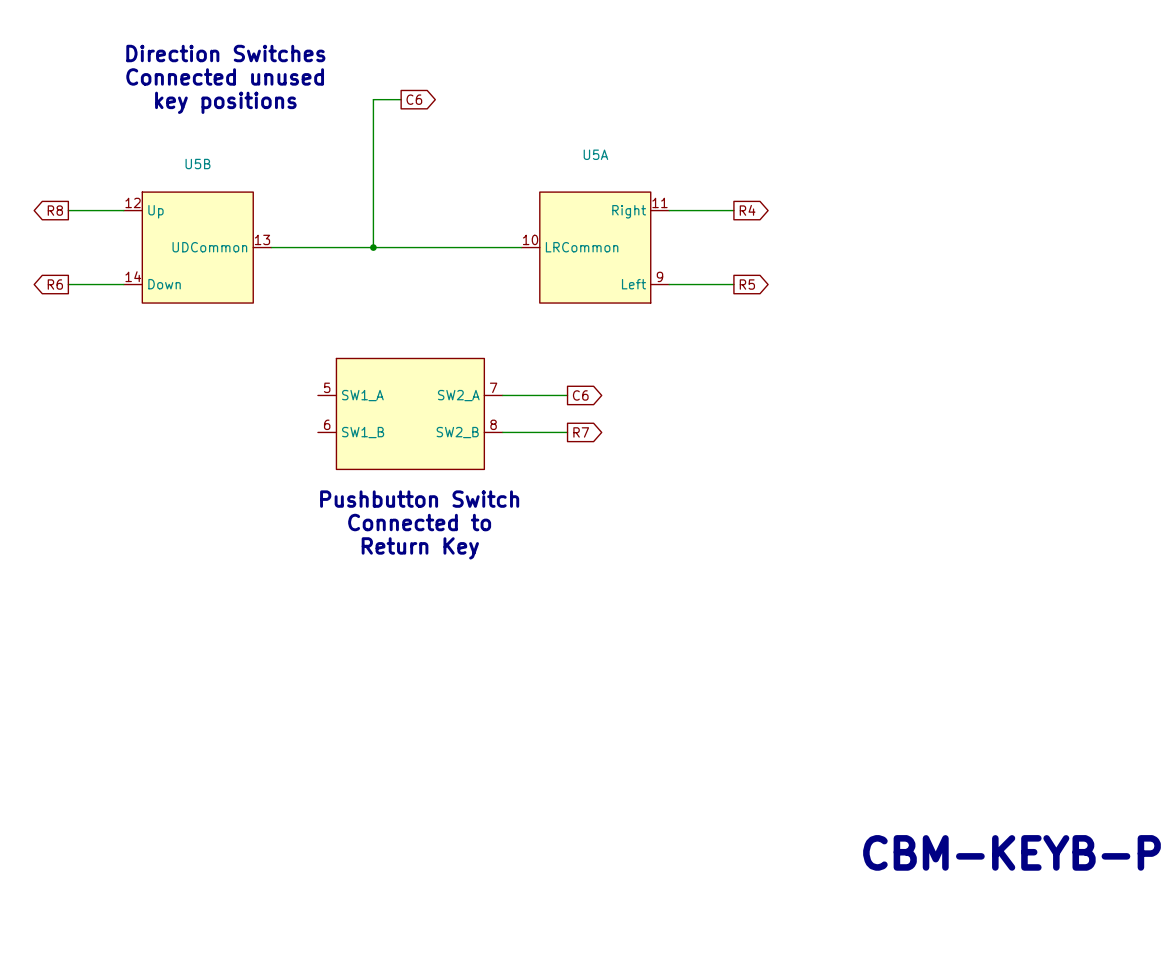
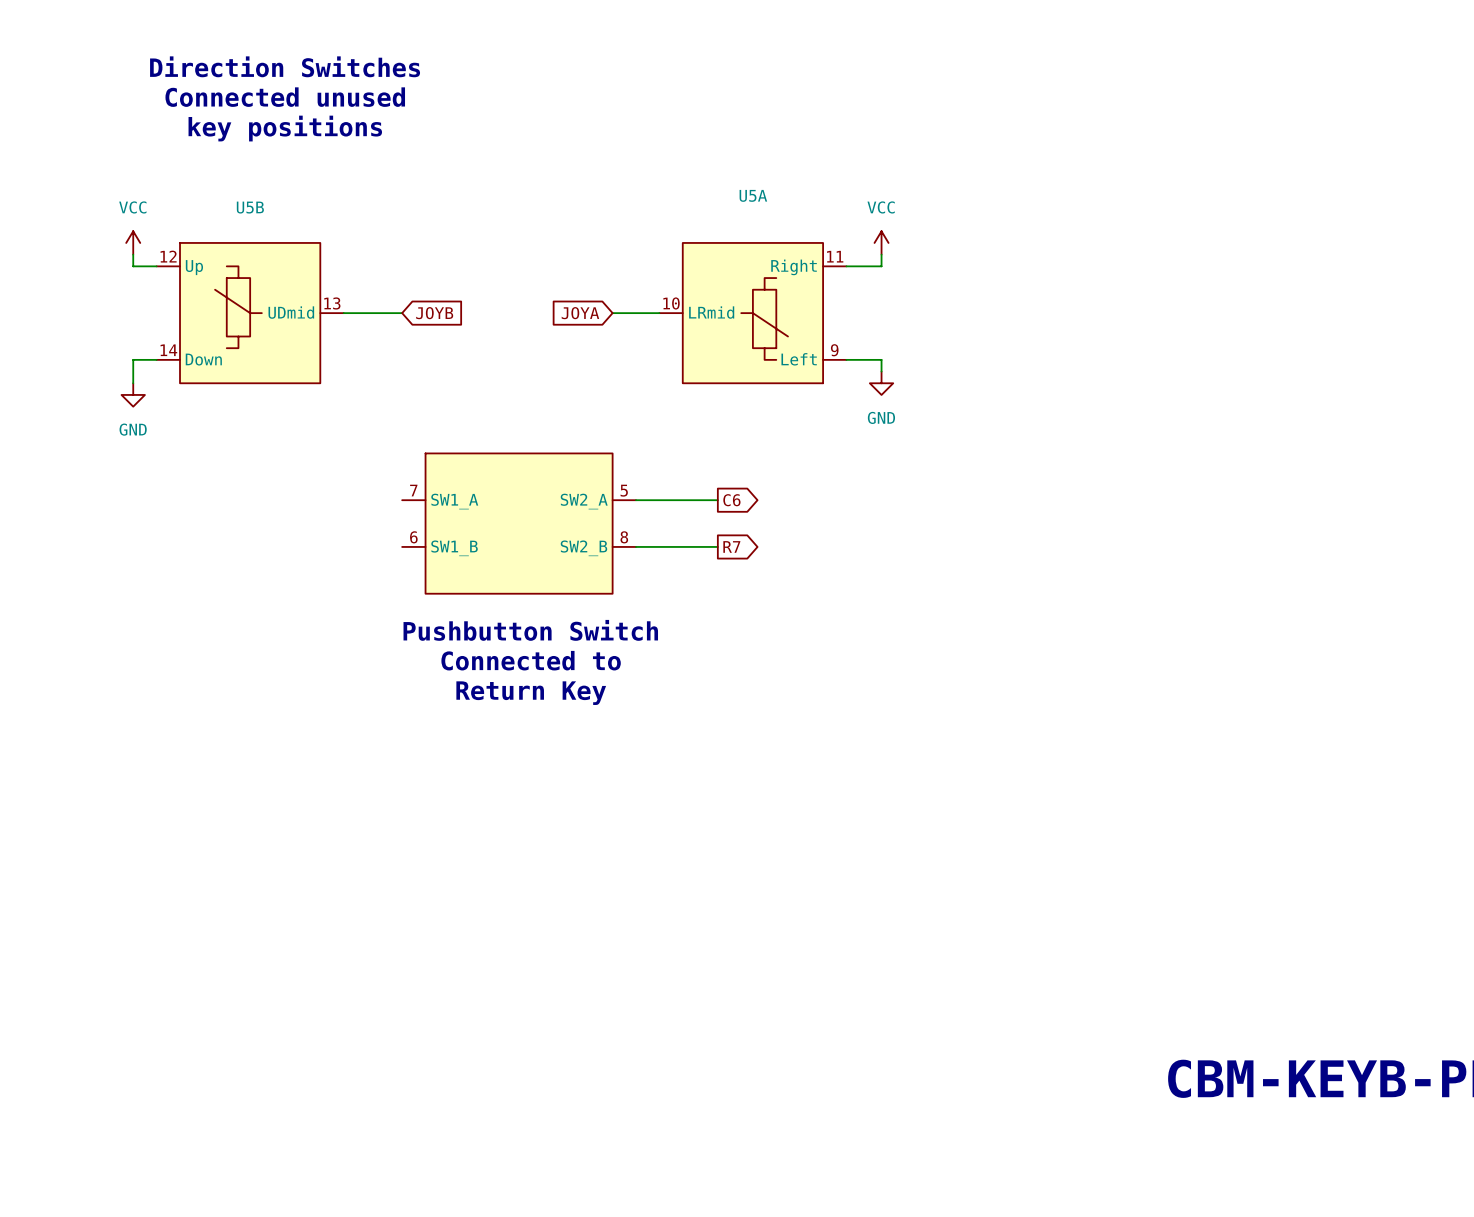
wire: (401, 99) (373, 99) (373, 247) -> none
global label: C6 (414, 99) -> none
power symbol: none -> VCC (133, 242)
U5B symbol: [123, 192, 272, 304] -> [156, 242, 344, 384]
U5A symbol: [521, 192, 670, 304] -> [659, 242, 847, 384]
power symbol: none -> VCC (881, 242)
global label: R8 (55, 210) -> none
wire: (68, 210) (105, 210) -> (133, 254) (133, 266)
wire: (696, 210) (733, 210) -> (881, 266) (881, 254)
global label: R4 (747, 210) -> none
wire: (317, 247) (484, 247) -> none
global label: none -> JOYB (434, 313)
junction: (373, 247) -> none
global label: none -> JOYA (580, 313)
global label: R6 (55, 284) -> none
wire: (68, 284) (105, 284) -> (133, 383) (133, 359)
wire: (696, 284) (733, 284) -> (881, 359) (881, 371)
global label: R5 (747, 284) -> none
power symbol: none -> GND (881, 383)
power symbol: none -> GND (133, 394)
part pin number: 5 (327, 387) -> 7 (413, 490)
part pin number: 7 (493, 387) -> 5 (624, 490)

